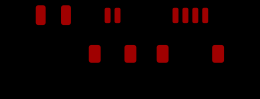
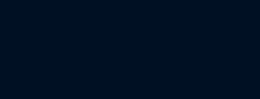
part: (40, 15) -> none
part: (65, 15) -> none
part: (112, 35) -> none
part: (190, 35) -> none

